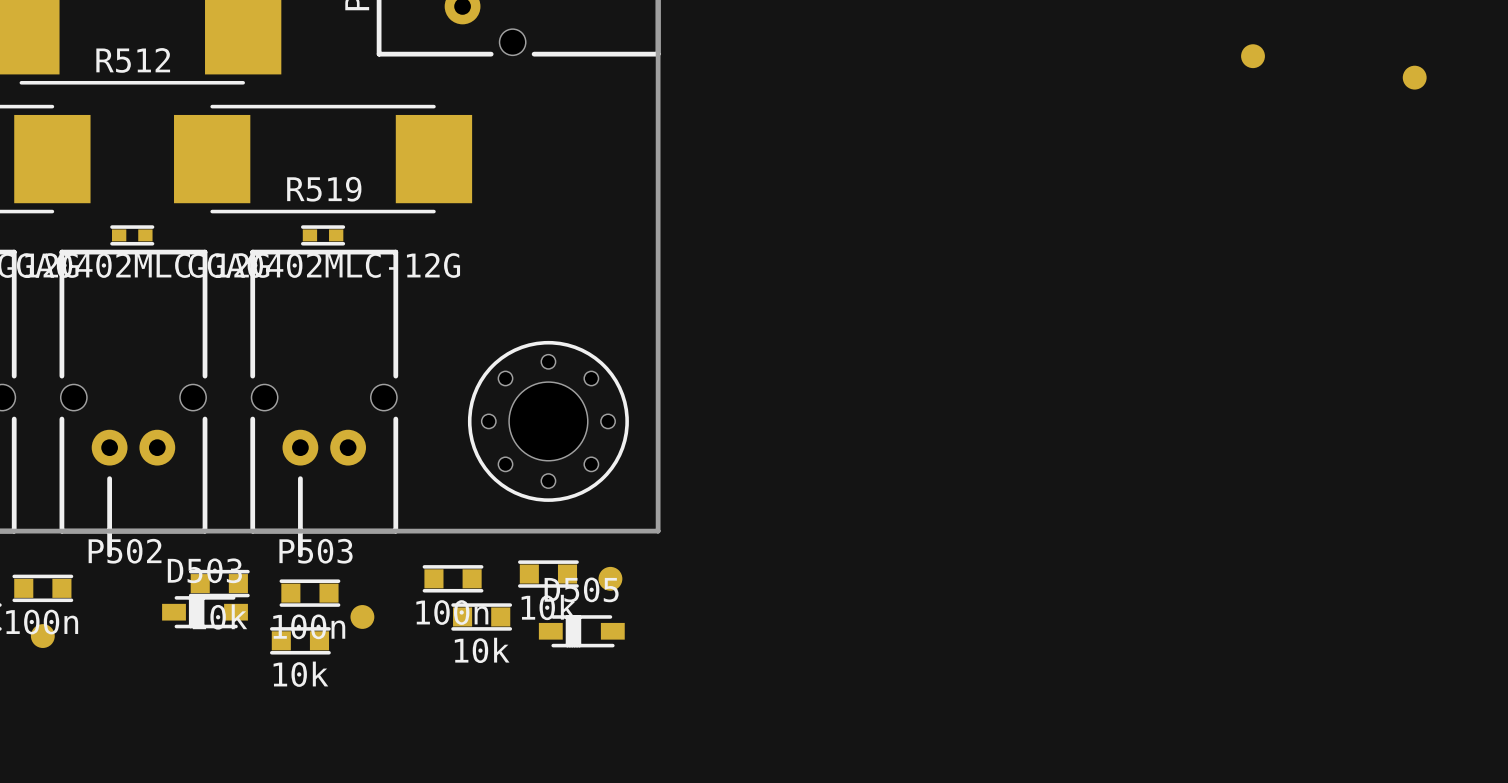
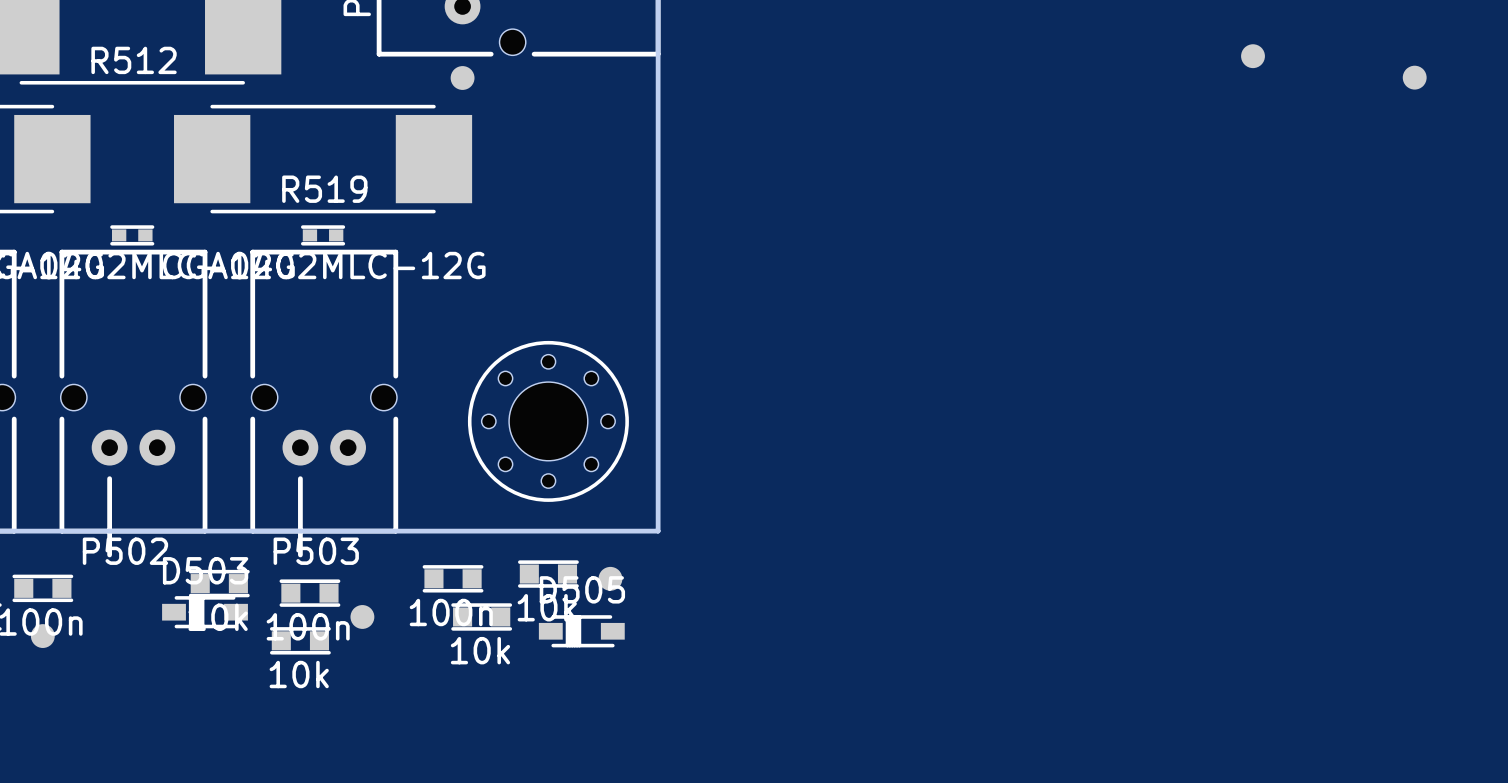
part: none -> (462, 78)

